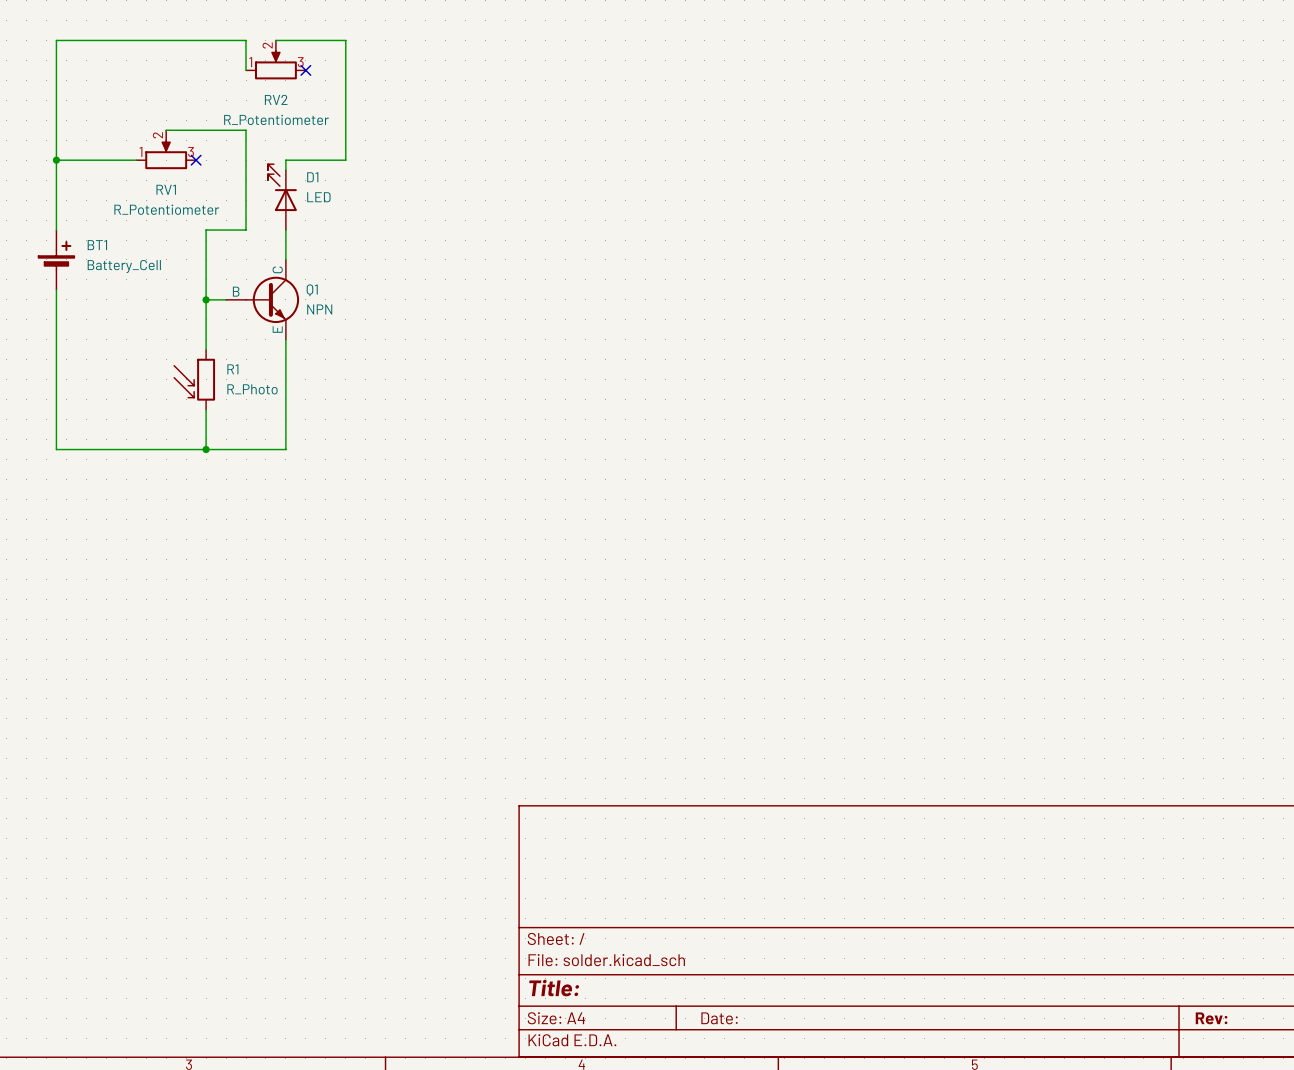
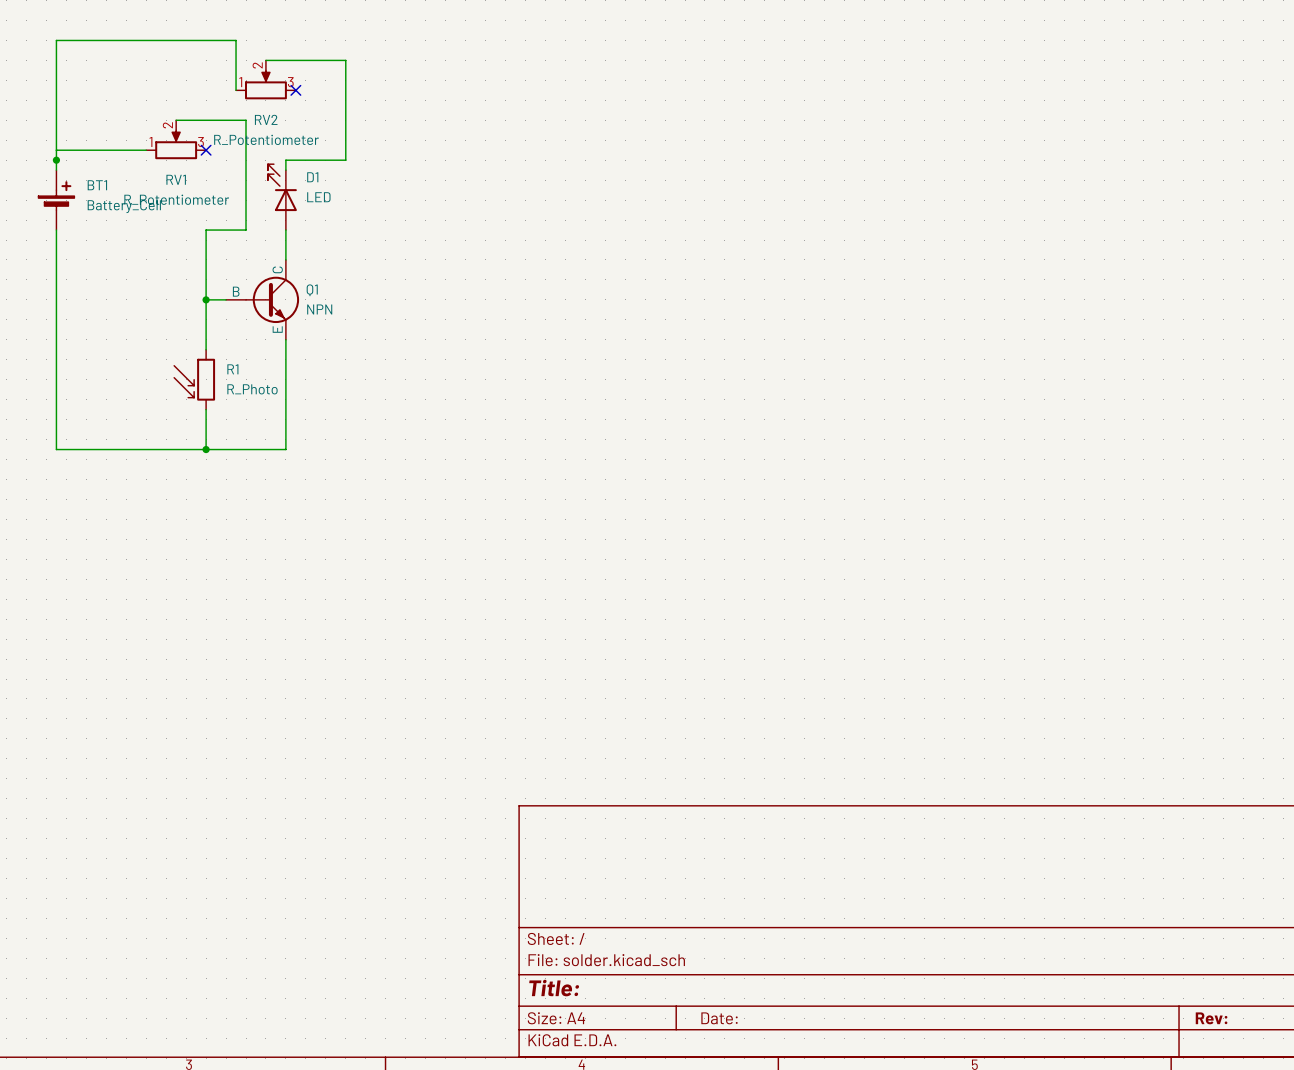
wire: (236, 40) (246, 40) (246, 70) -> (236, 40) (236, 90)
wire: (275, 40) (345, 40) (345, 60) -> (265, 60) (345, 60)
RV2 position: (275, 59) -> (265, 79)
no-connect mark position: (305, 70) -> (295, 90)
wire: (166, 130) (246, 130) -> (176, 120) (246, 120) (246, 130)
RV1 position: (166, 149) -> (176, 139)
wire: none -> (56, 150) (146, 150)
wire: (56, 160) (136, 160) -> none
no-connect mark position: (196, 160) -> (206, 150)
BT1 position: (56, 259) -> (56, 200)

